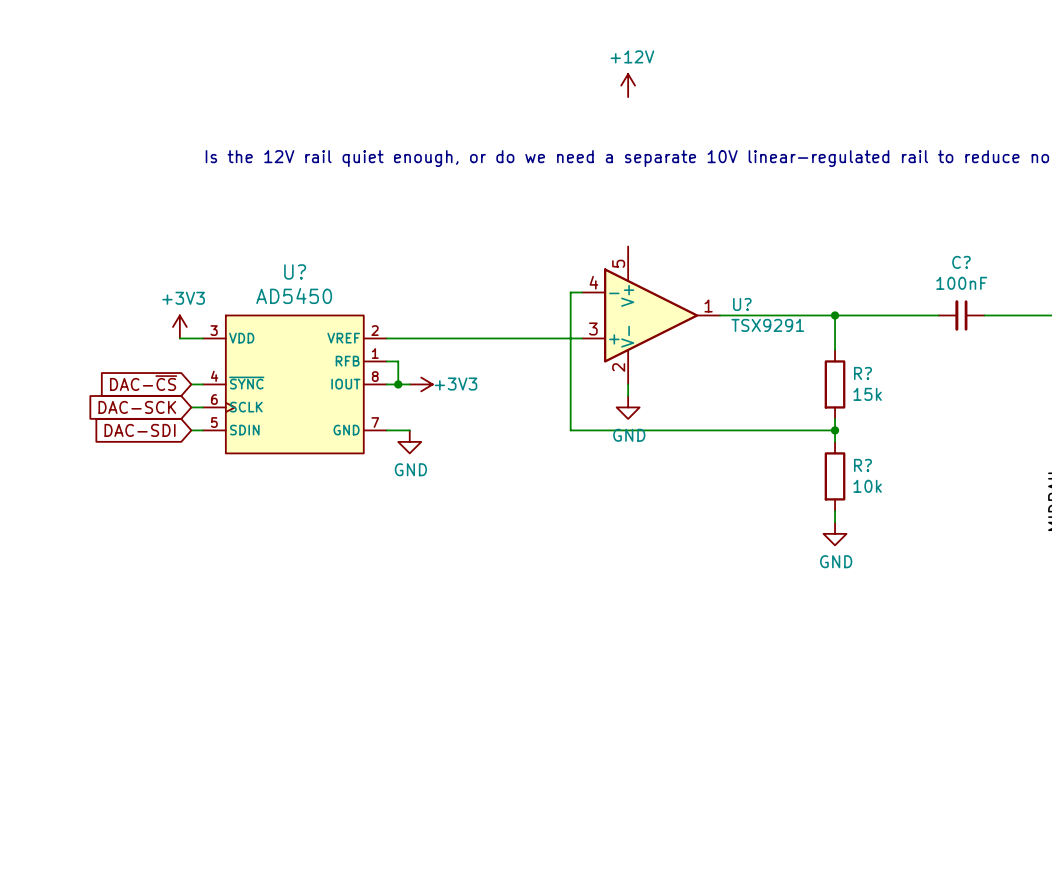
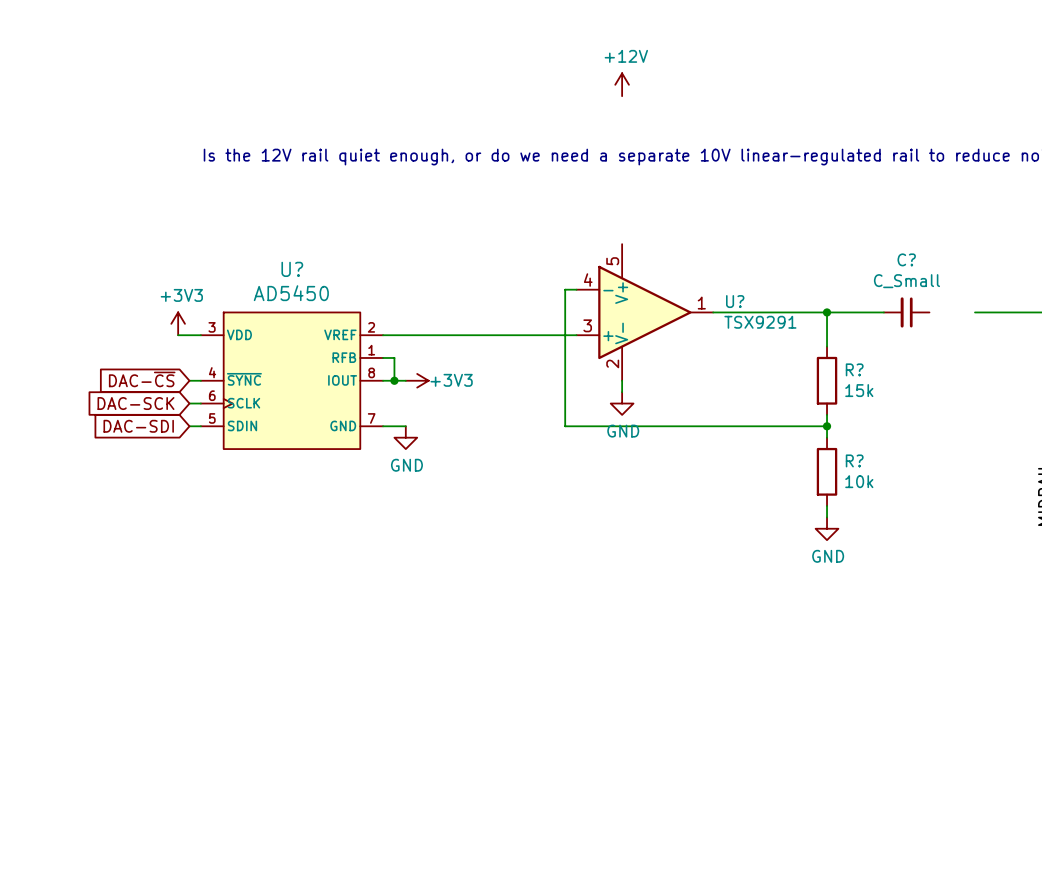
C?: none -> C_Small (906, 312)
C?: 100nF (961, 315) -> none

